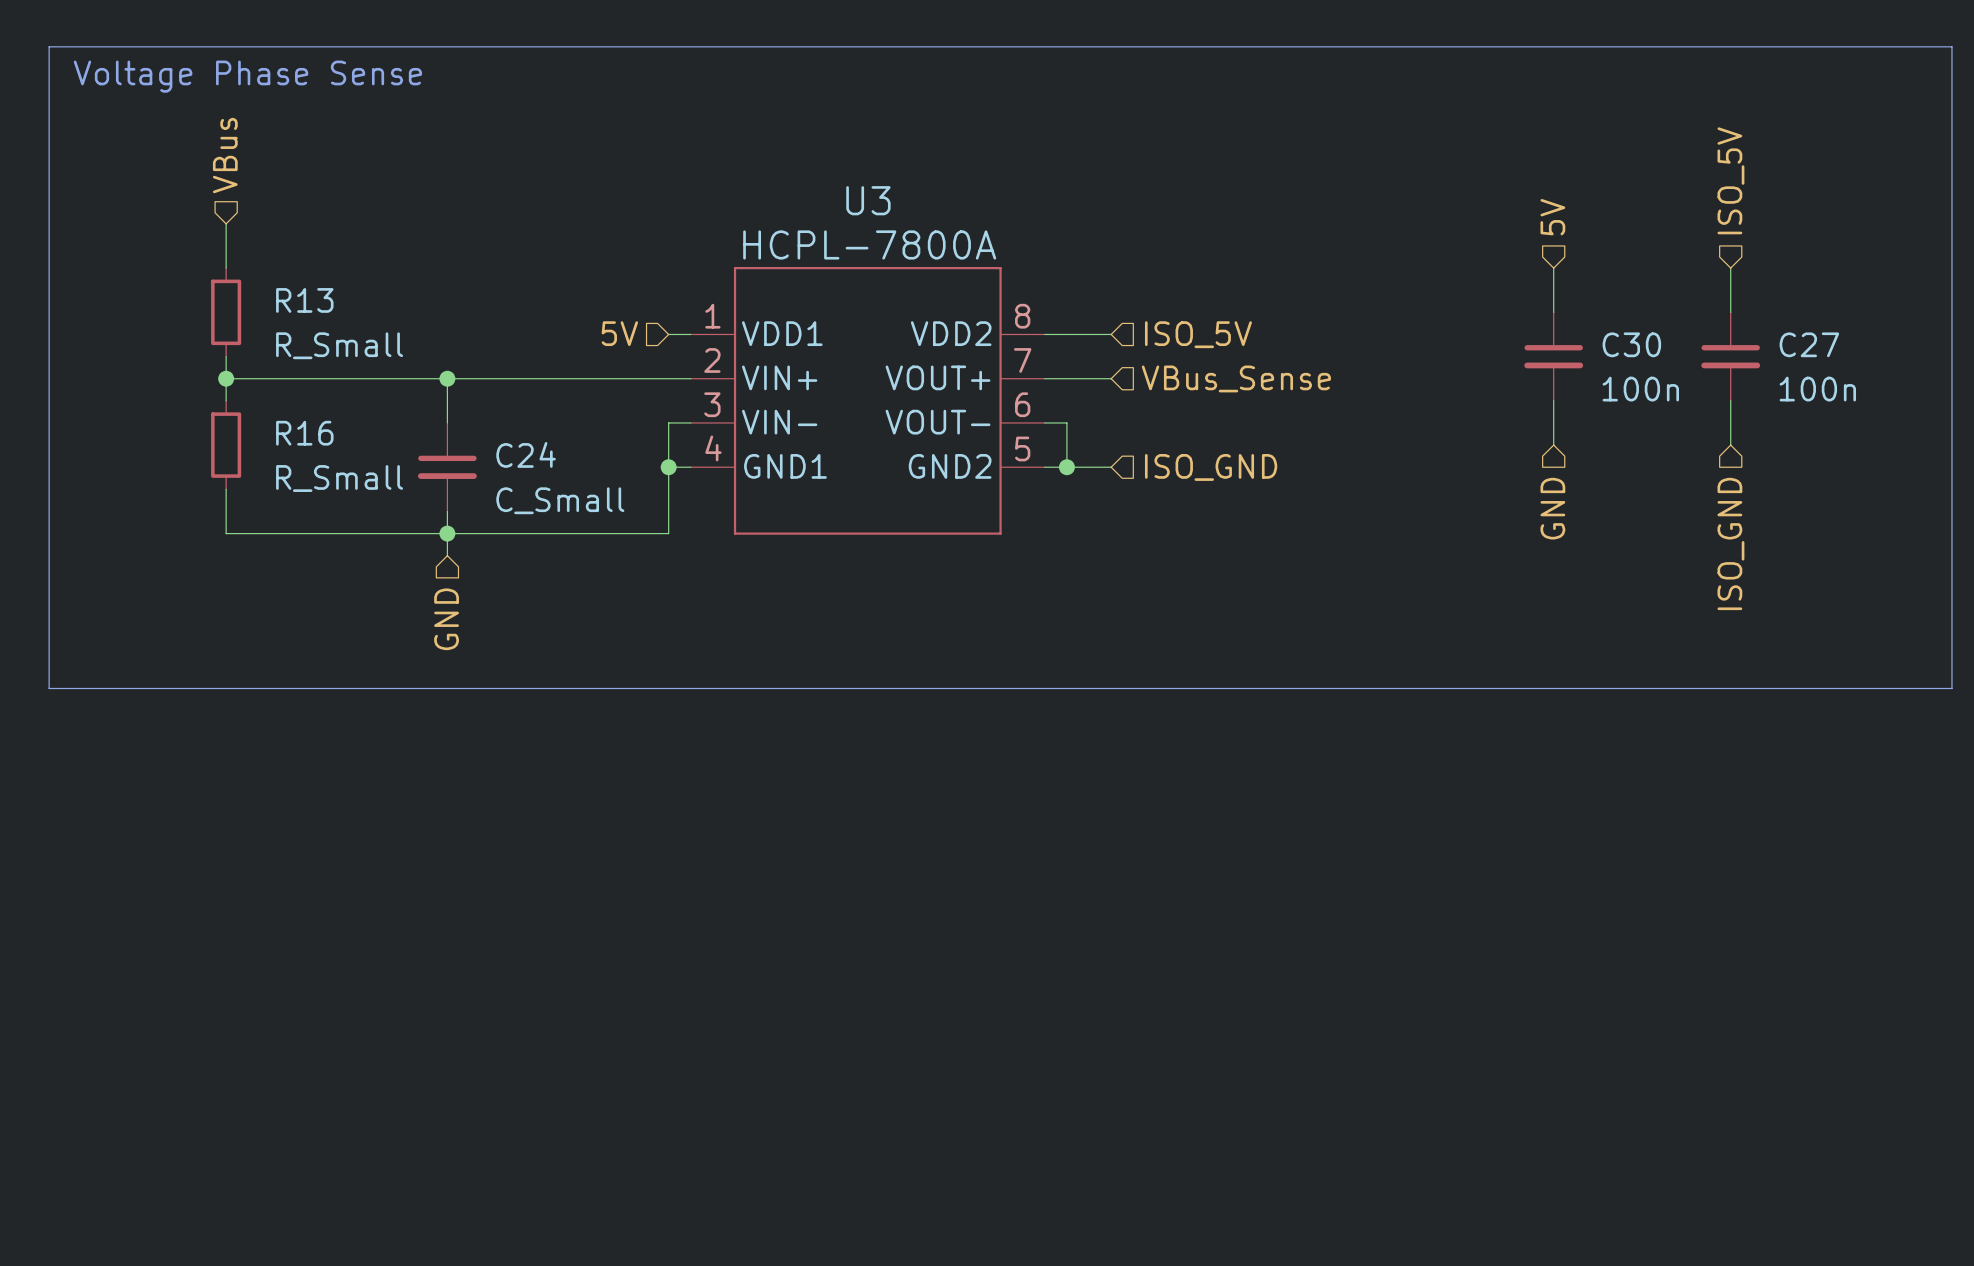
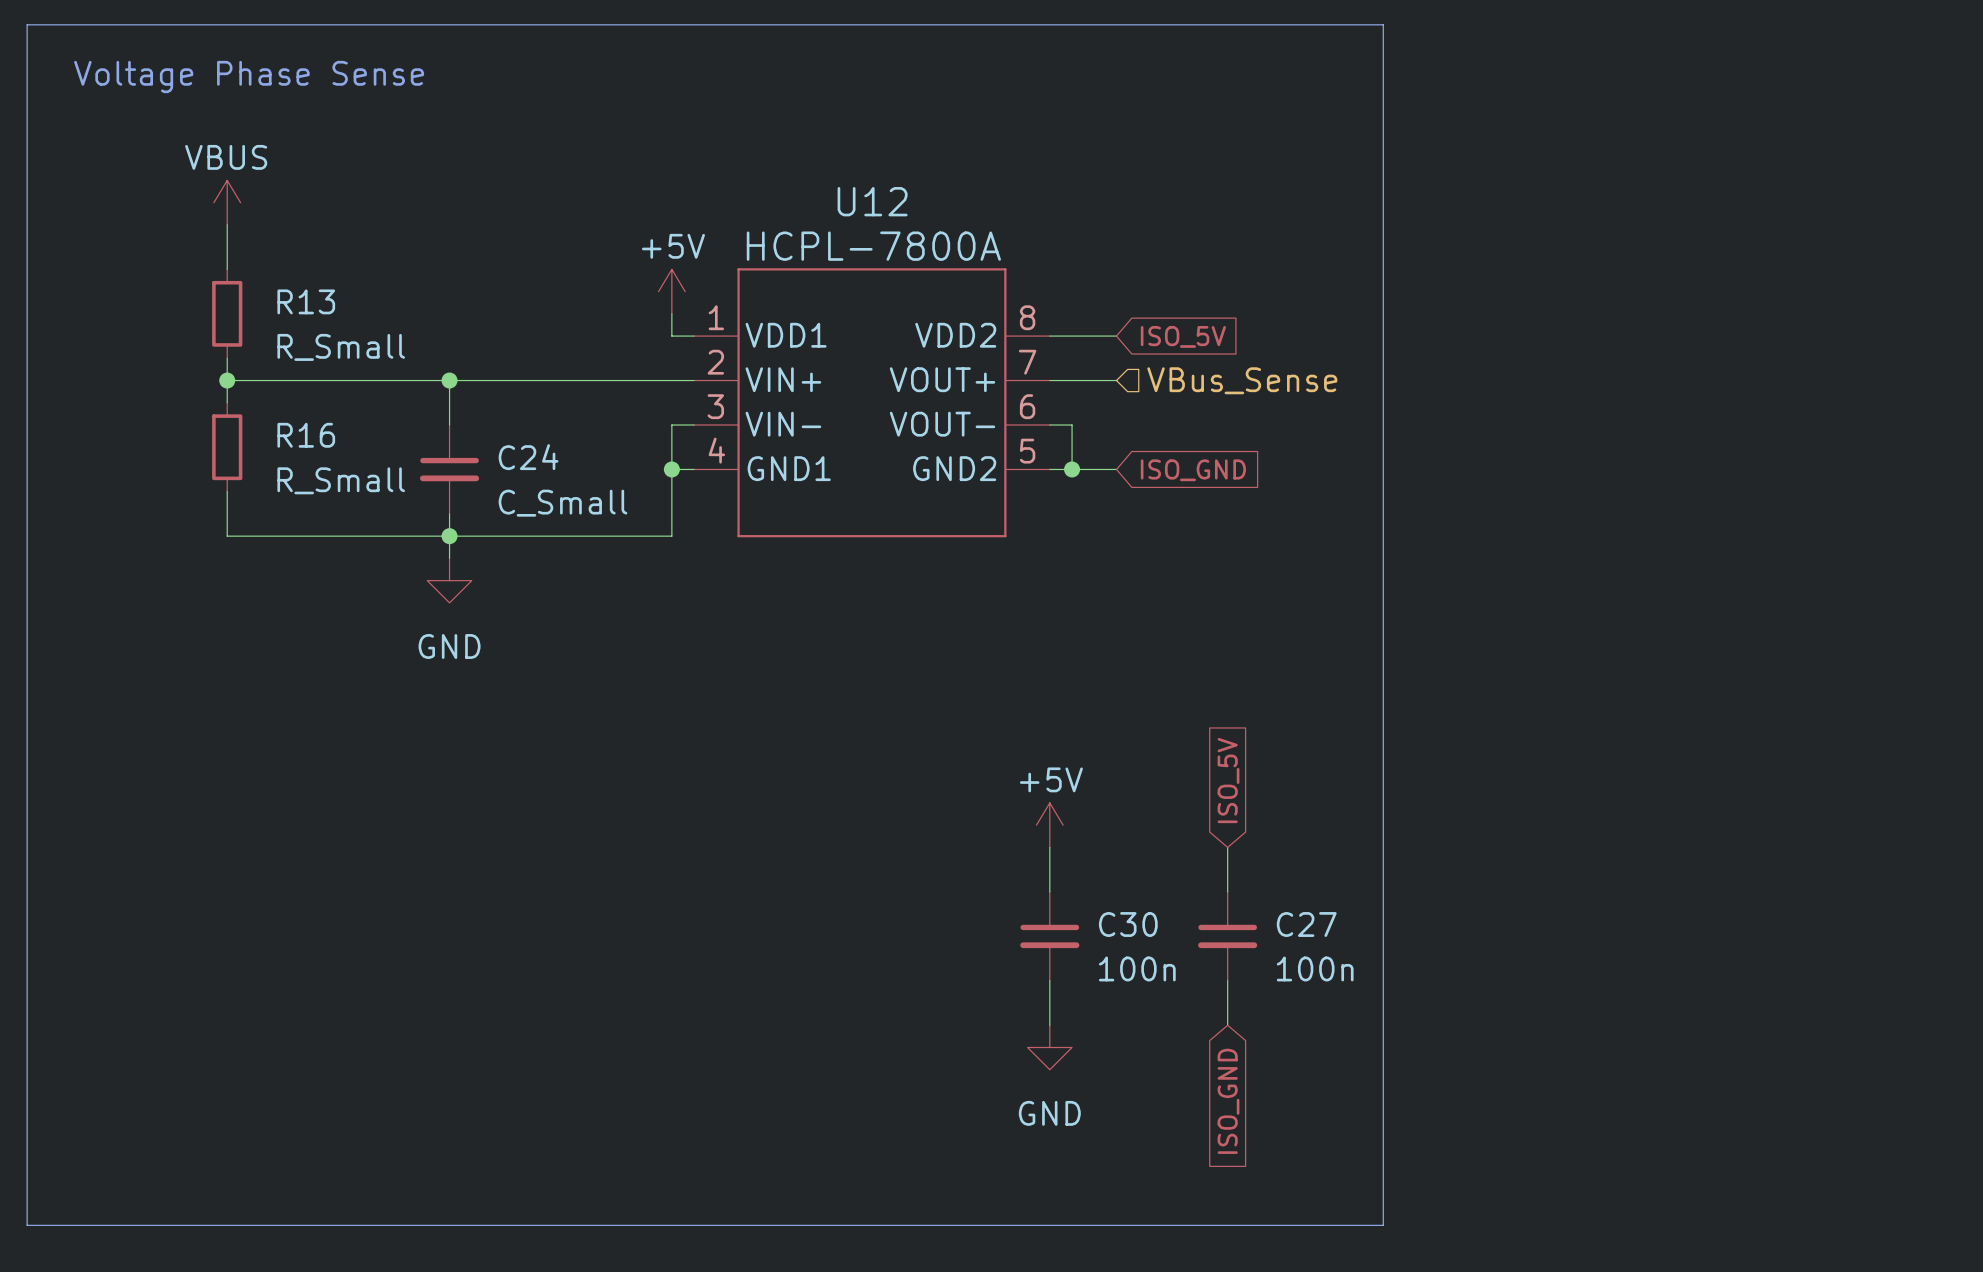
line: none -> (27, 24) (27, 1225) (1383, 1225) (1383, 24) (27, 24)
line: (49, 46) (1951, 46) (1951, 688) (49, 688) (49, 46) -> none
hierarchical label: VBus (225, 155) -> none
hierarchical label: ISO_5V (1730, 180) -> none
U3 name: U3 (868, 200) -> U12 (872, 201)
power symbol: none -> VBUS (227, 202)
hierarchical label: 5V (1552, 217) -> none
wire: (1553, 268) (1553, 312) -> none
wire: (1730, 268) (1730, 312) -> none
power symbol: none -> +5V (671, 291)
wire: none -> (671, 313) (671, 336)
hierarchical label: 5V (619, 333) -> none
hierarchical label: ISO_5V (1198, 334) -> none
global label: none -> ISO_5V (1183, 336)
C30 position: (1553, 356) -> (1049, 936)
C27 position: (1730, 356) -> (1227, 936)
wire: (1553, 400) (1553, 445) -> none
wire: (1730, 400) (1730, 445) -> none
hierarchical label: ISO_GND (1211, 467) -> none
global label: none -> ISO_GND (1193, 470)
hierarchical label: GND (1552, 508) -> none
hierarchical label: ISO_GND (1730, 543) -> none
power symbol: none -> GND (449, 580)
hierarchical label: GND (446, 619) -> none
global label: none -> ISO_5V (1228, 780)
power symbol: none -> +5V (1049, 825)
wire: none -> (1049, 847) (1049, 891)
wire: none -> (1227, 847) (1227, 891)
wire: none -> (1049, 980) (1049, 1025)
wire: none -> (1227, 980) (1227, 1025)
power symbol: none -> GND (1049, 1047)
global label: none -> ISO_GND (1228, 1101)

